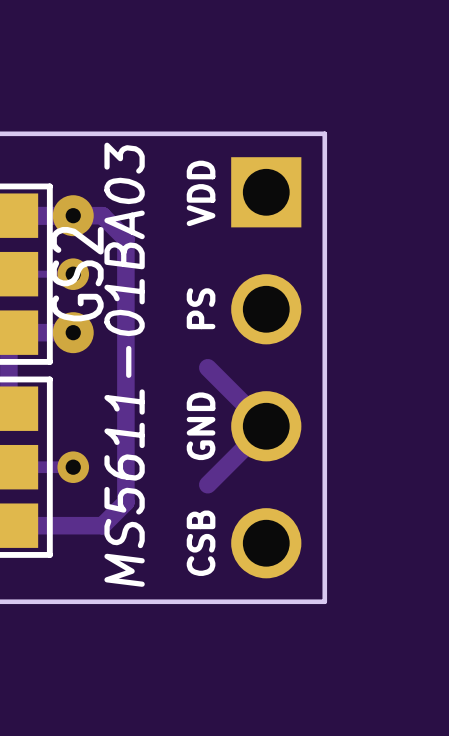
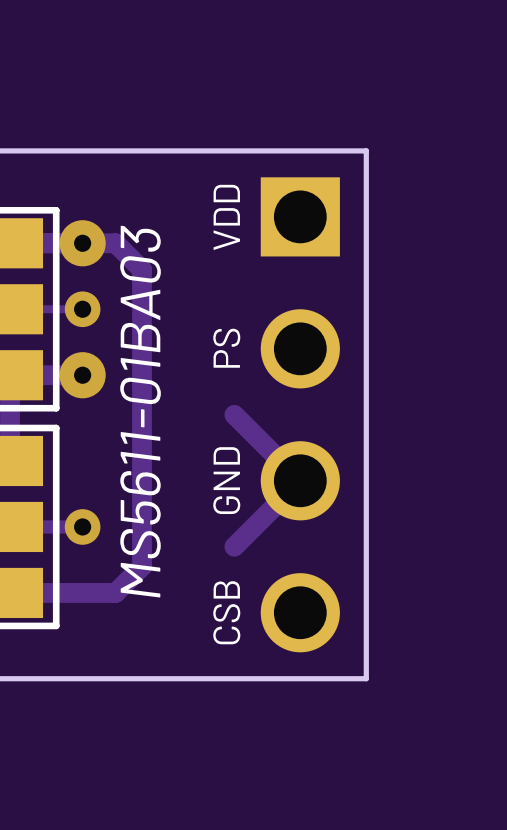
GS2 name: GS2 (77, 274) -> none

